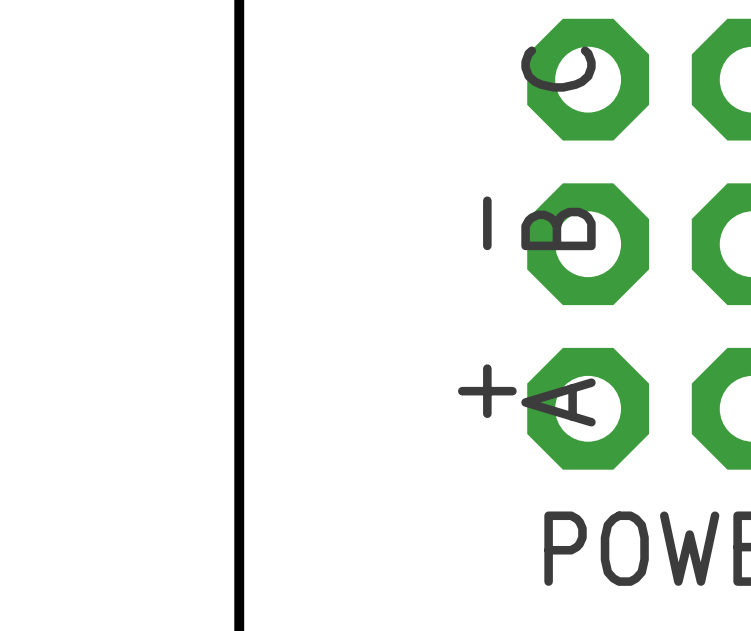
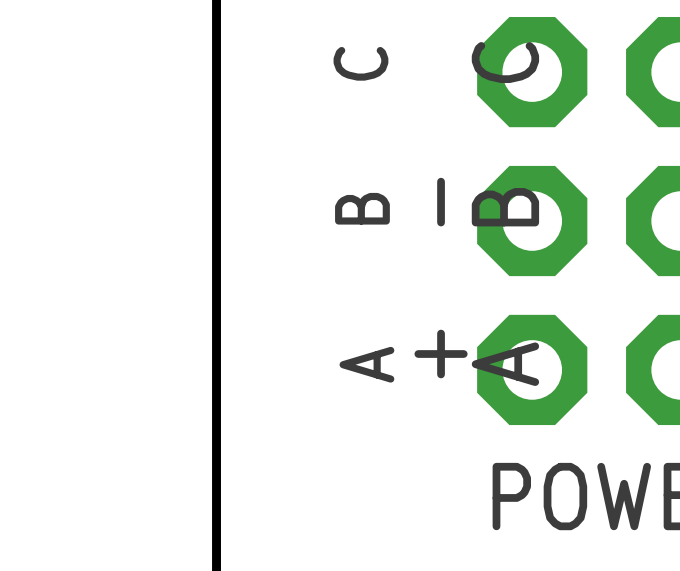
text: none -> C (360, 63)
text: none -> B (362, 208)
text: none -> A (366, 364)

